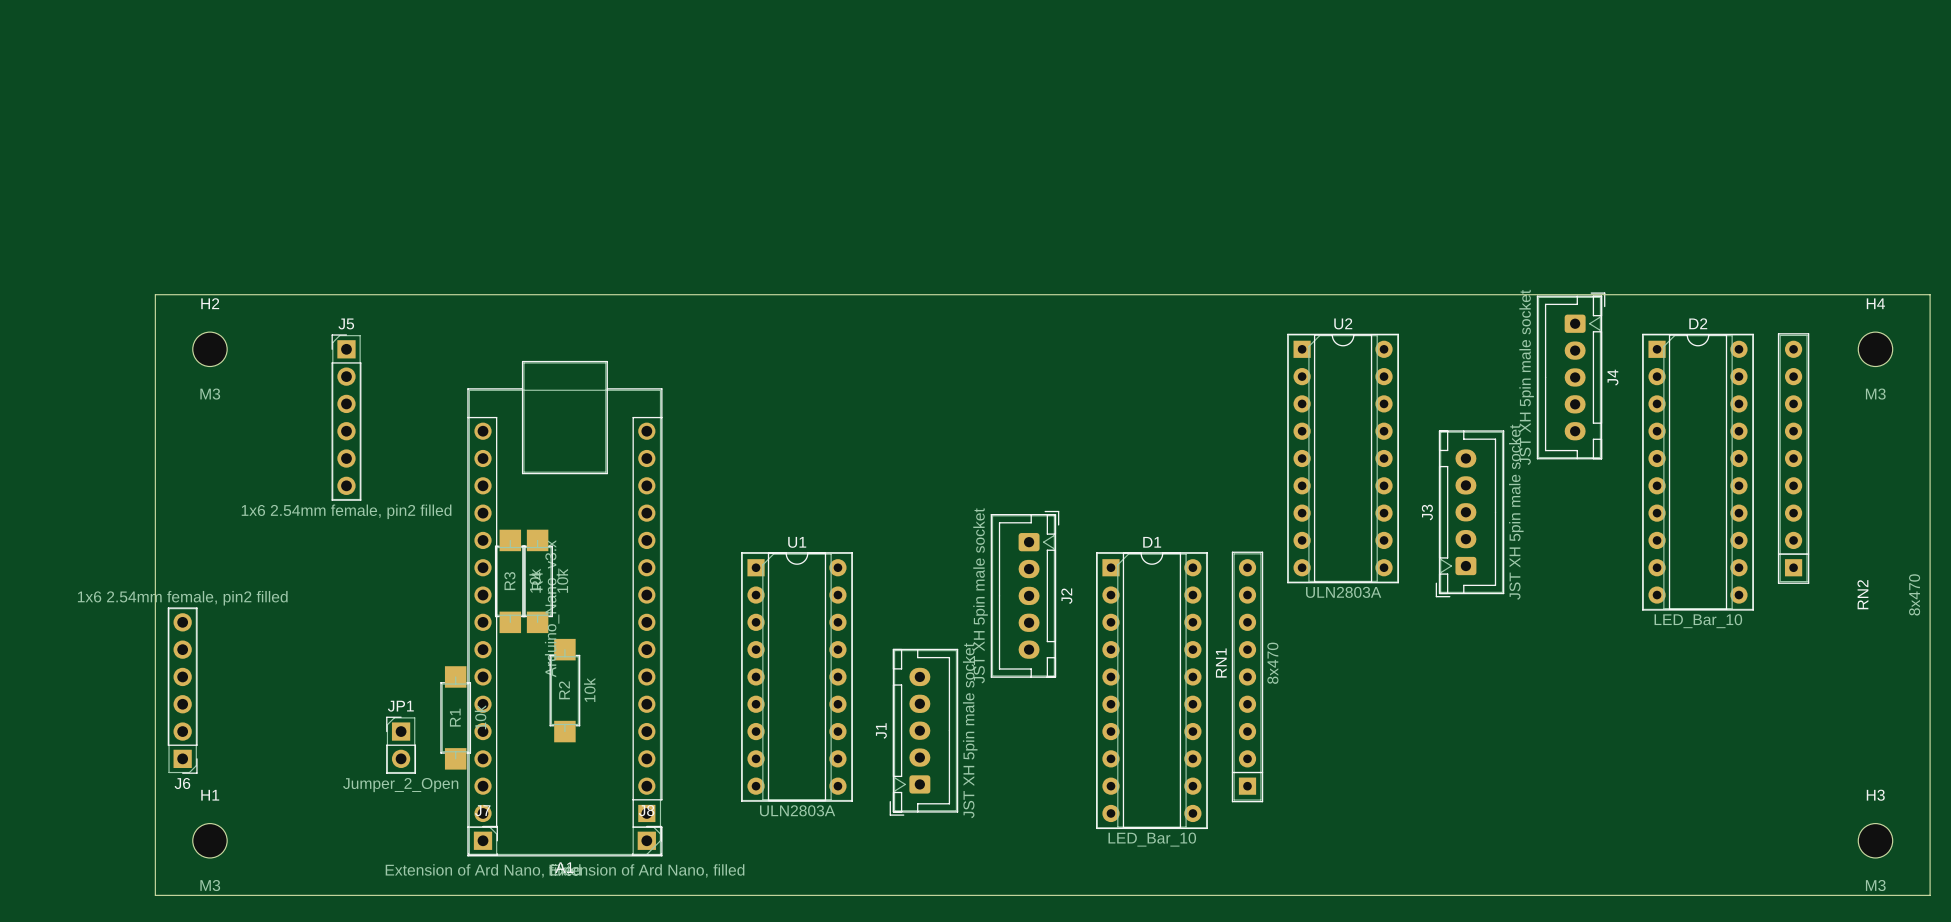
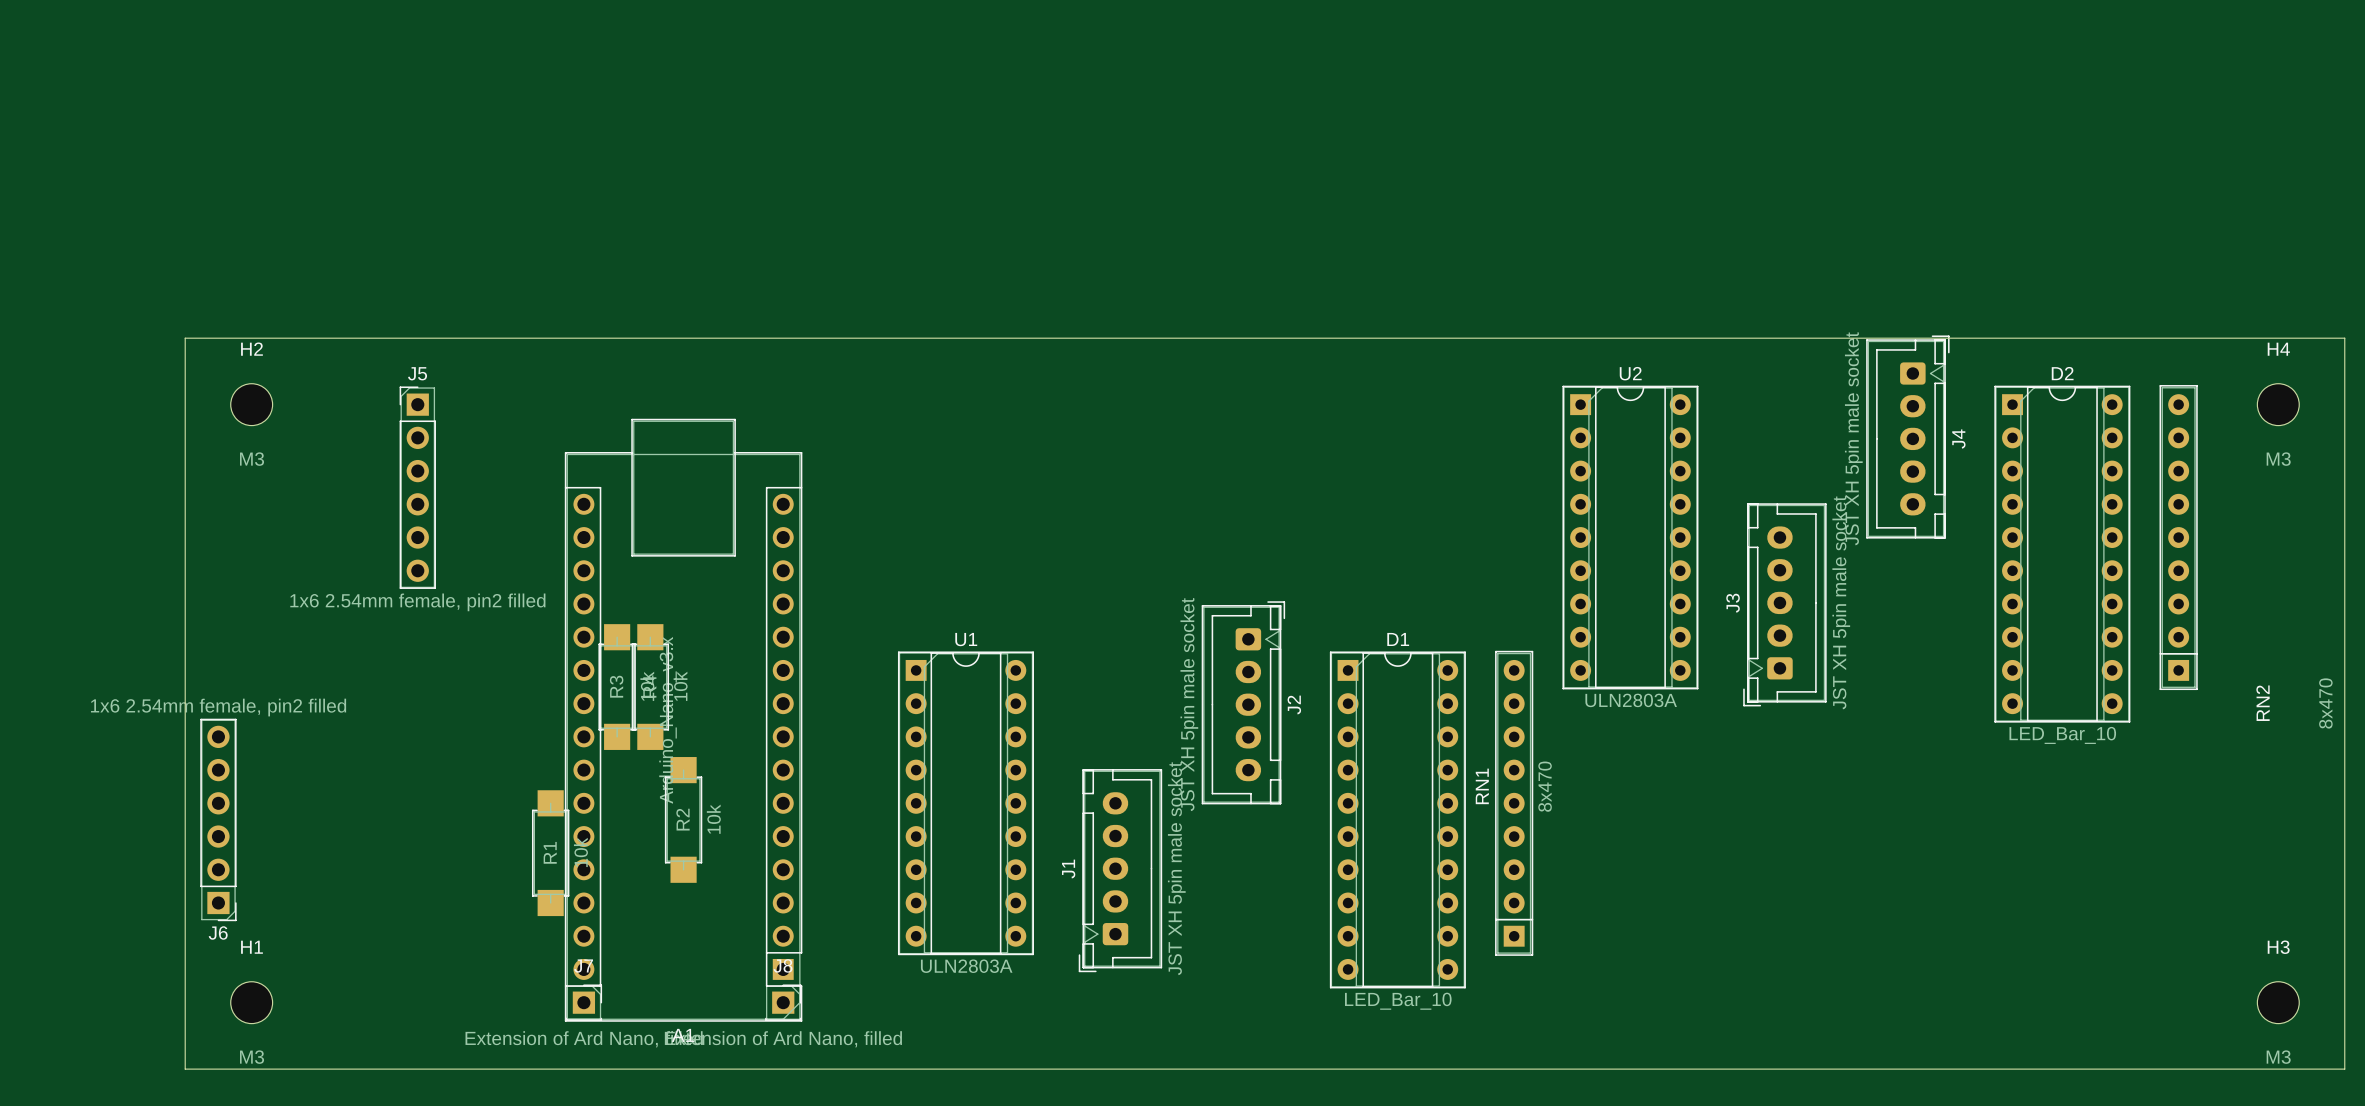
JP1: Jumper_2_Open (401, 745) -> none

